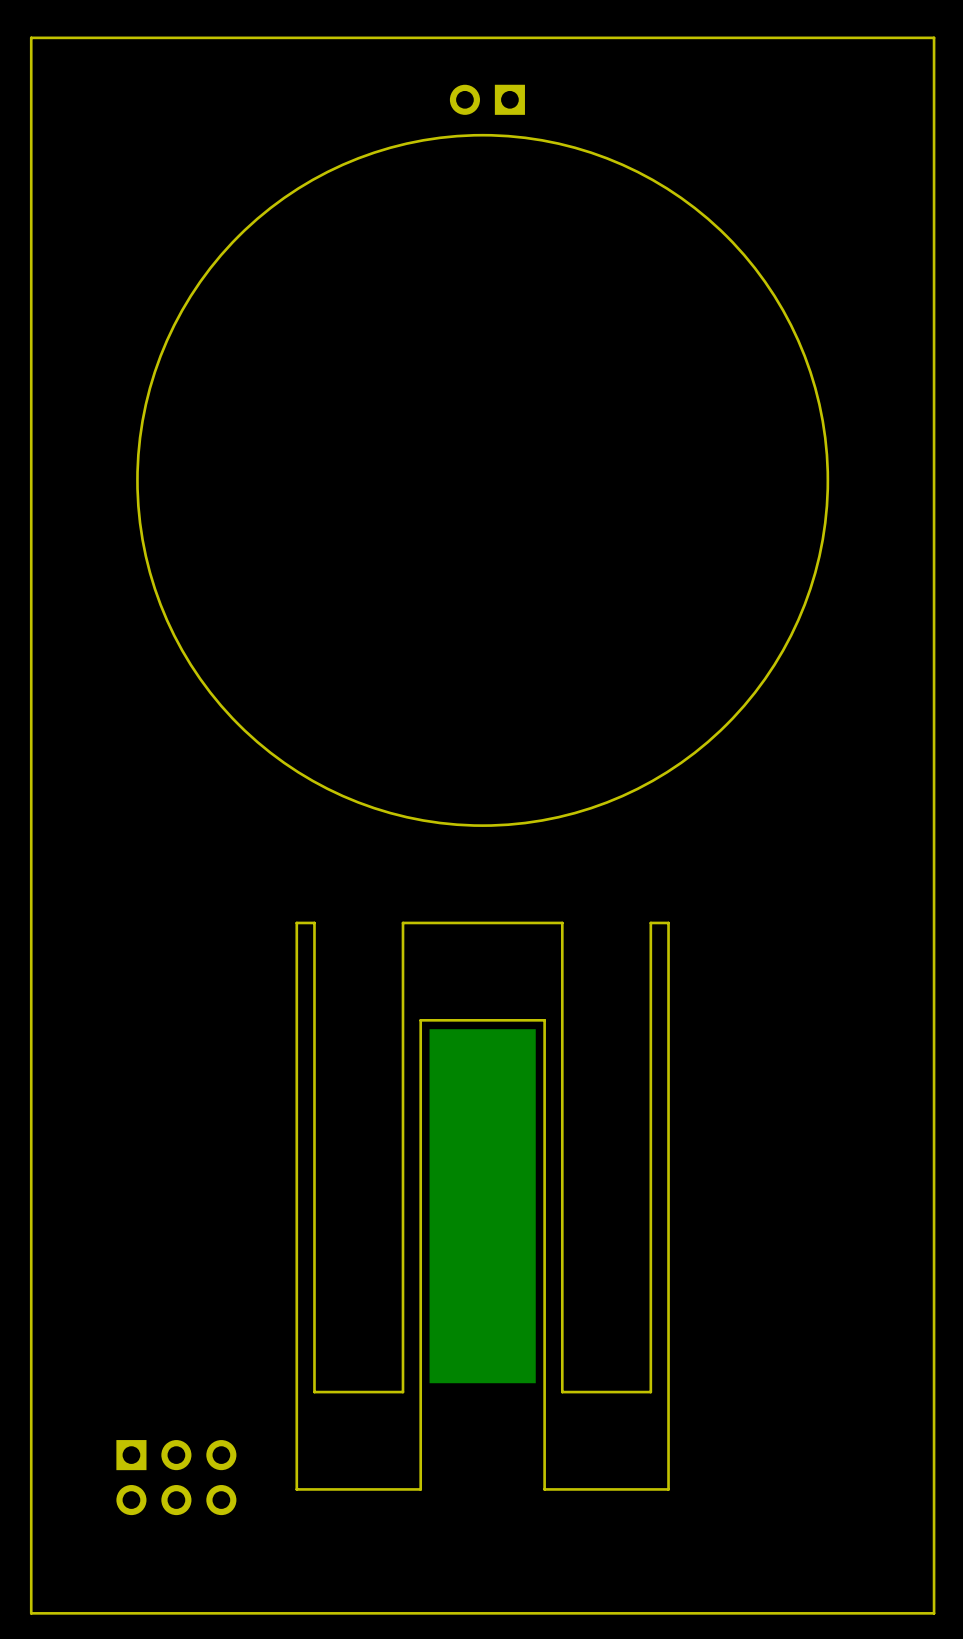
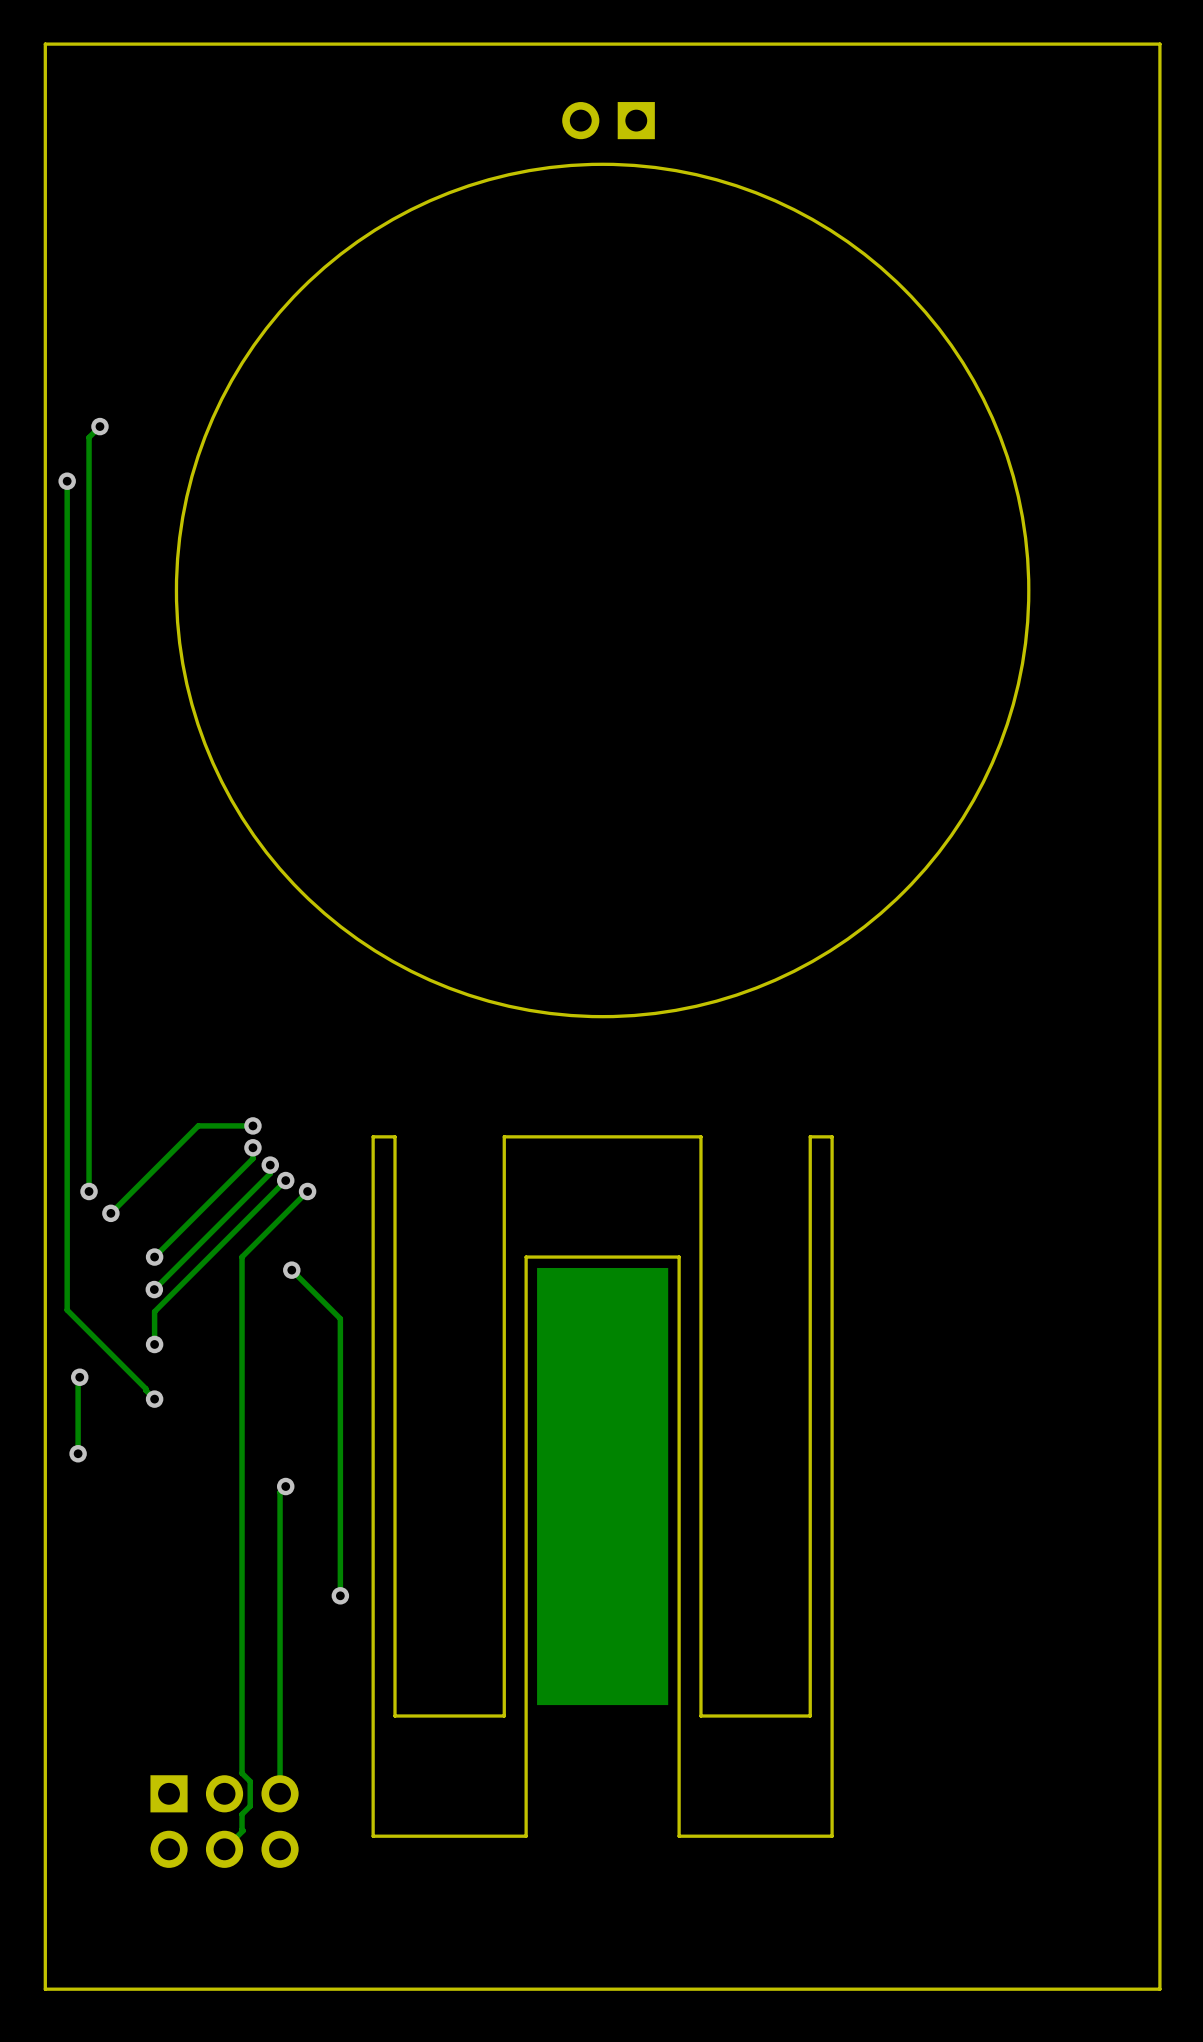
track: none -> (99, 426) (89, 437) (89, 1191)
via: none -> (99, 426)
track: none -> (67, 481) (67, 1310) (154, 1399)
via: none -> (67, 481)
track: none -> (252, 1125) (198, 1125) (110, 1213)
via: none -> (252, 1125)
track: none -> (252, 1147) (252, 1158) (154, 1257)
via: none -> (252, 1147)
track: none -> (270, 1165) (270, 1173) (154, 1289)
via: none -> (270, 1165)
track: none -> (285, 1180) (154, 1311) (154, 1344)
via: none -> (285, 1180)
via: none -> (89, 1191)
track: none -> (307, 1191) (242, 1257) (242, 1773) (250, 1781) (250, 1806) (242, 1814) (243, 1830) (224, 1849)
via: none -> (307, 1191)
via: none -> (110, 1213)
via: none -> (154, 1257)
track: none -> (291, 1270) (340, 1318) (340, 1595)
via: none -> (291, 1270)
via: none -> (154, 1289)
via: none -> (154, 1344)
track: none -> (79, 1377) (78, 1378) (78, 1453)
via: none -> (79, 1377)
via: none -> (154, 1399)
via: none -> (78, 1453)
track: none -> (285, 1486) (280, 1492) (280, 1793)
via: none -> (285, 1486)
via: none -> (340, 1595)

